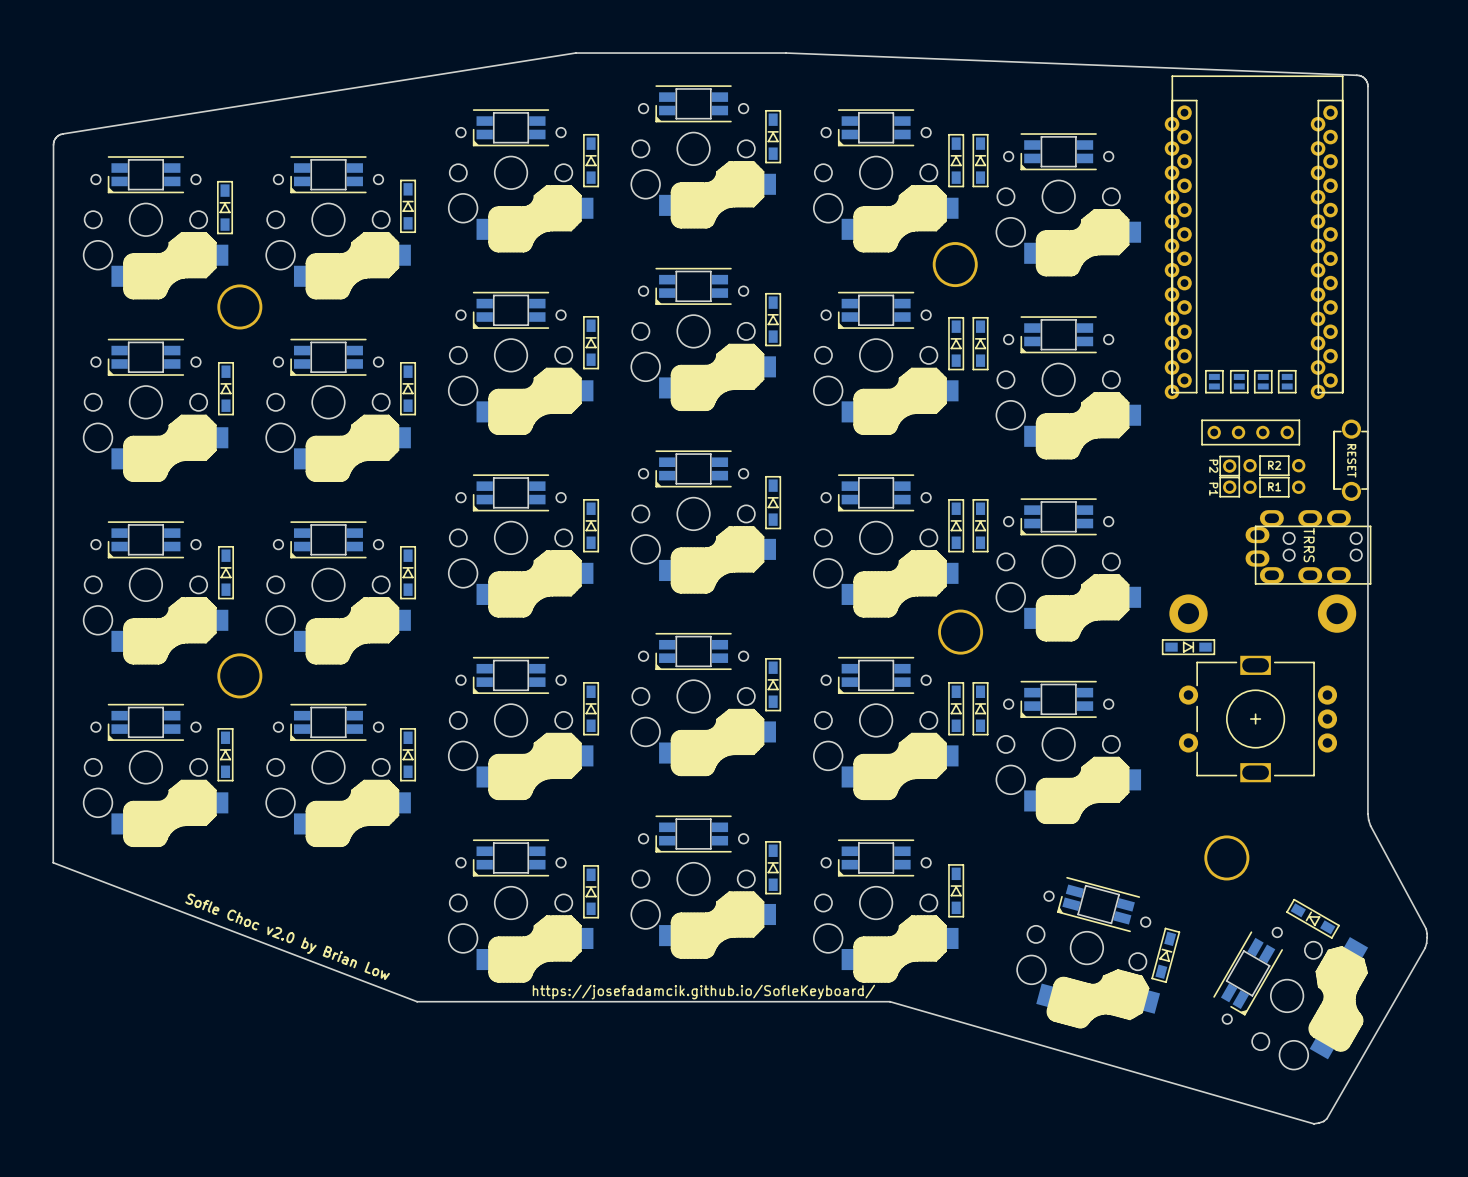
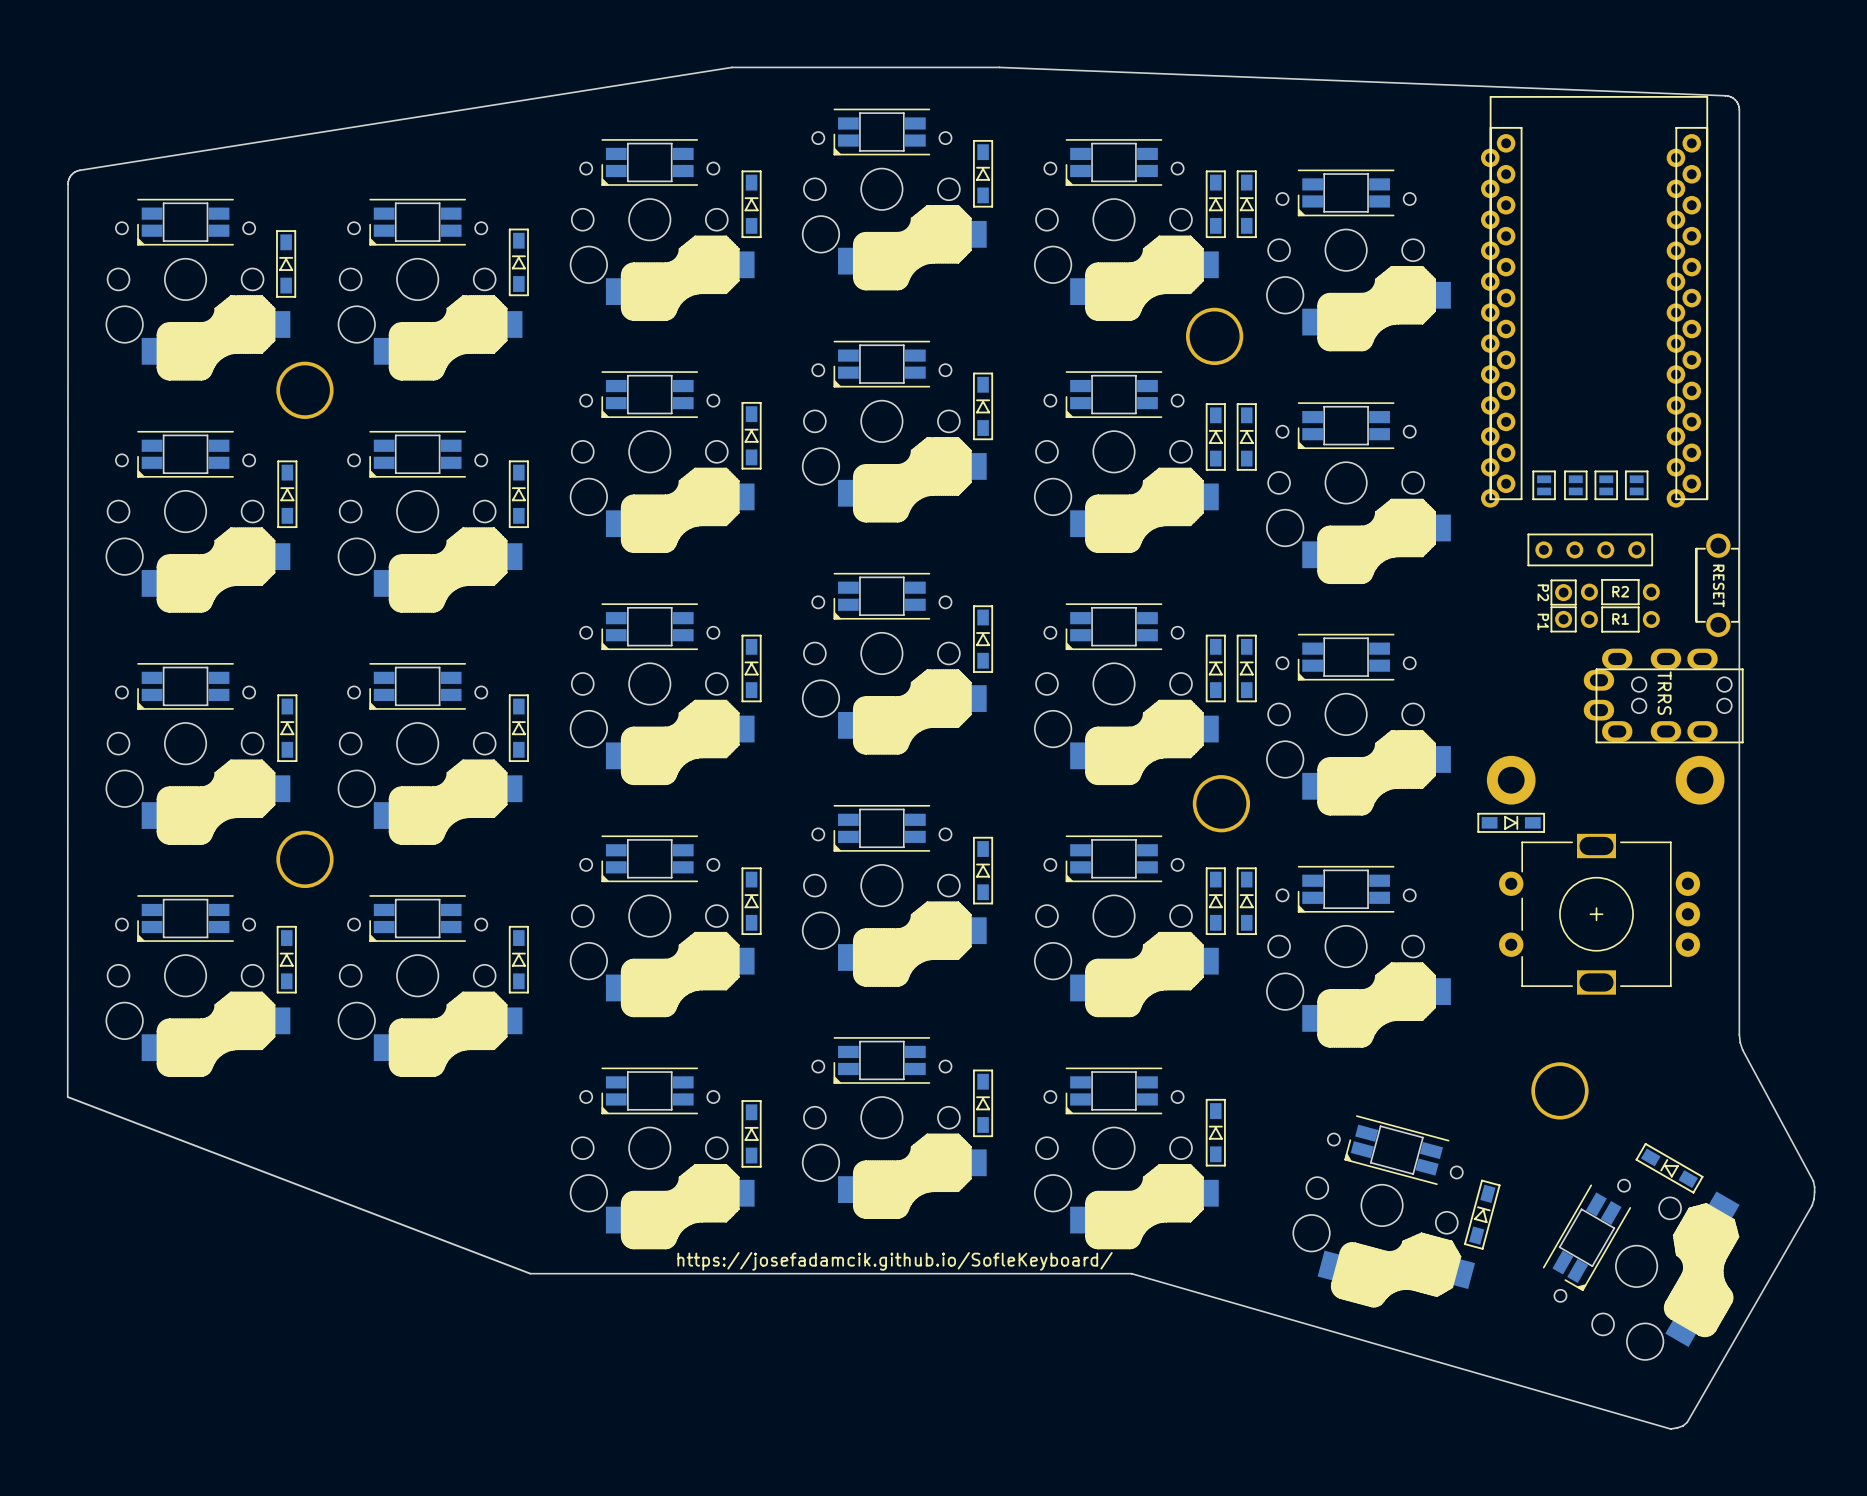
text: Sofle Choc v2.0 by Brian Low (287, 936) -> none

